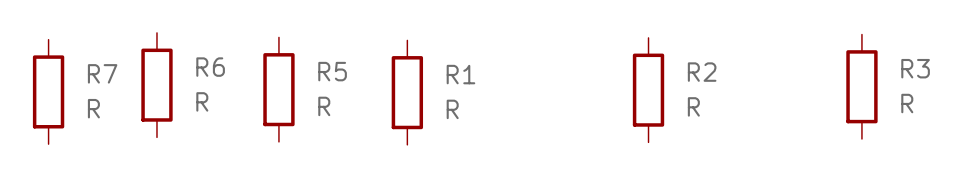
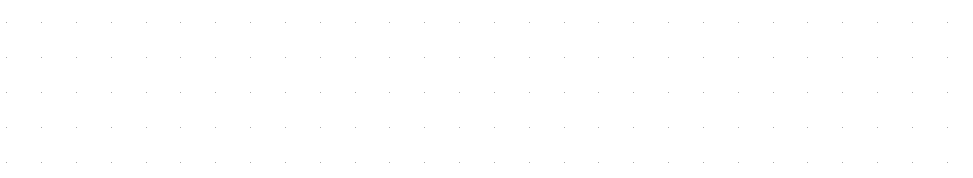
R6: R (156, 85) -> none
R3: R (861, 86) -> none
R5: R (278, 89) -> none
R2: R (648, 90) -> none
R7: R (48, 91) -> none
R1: R (407, 92) -> none

